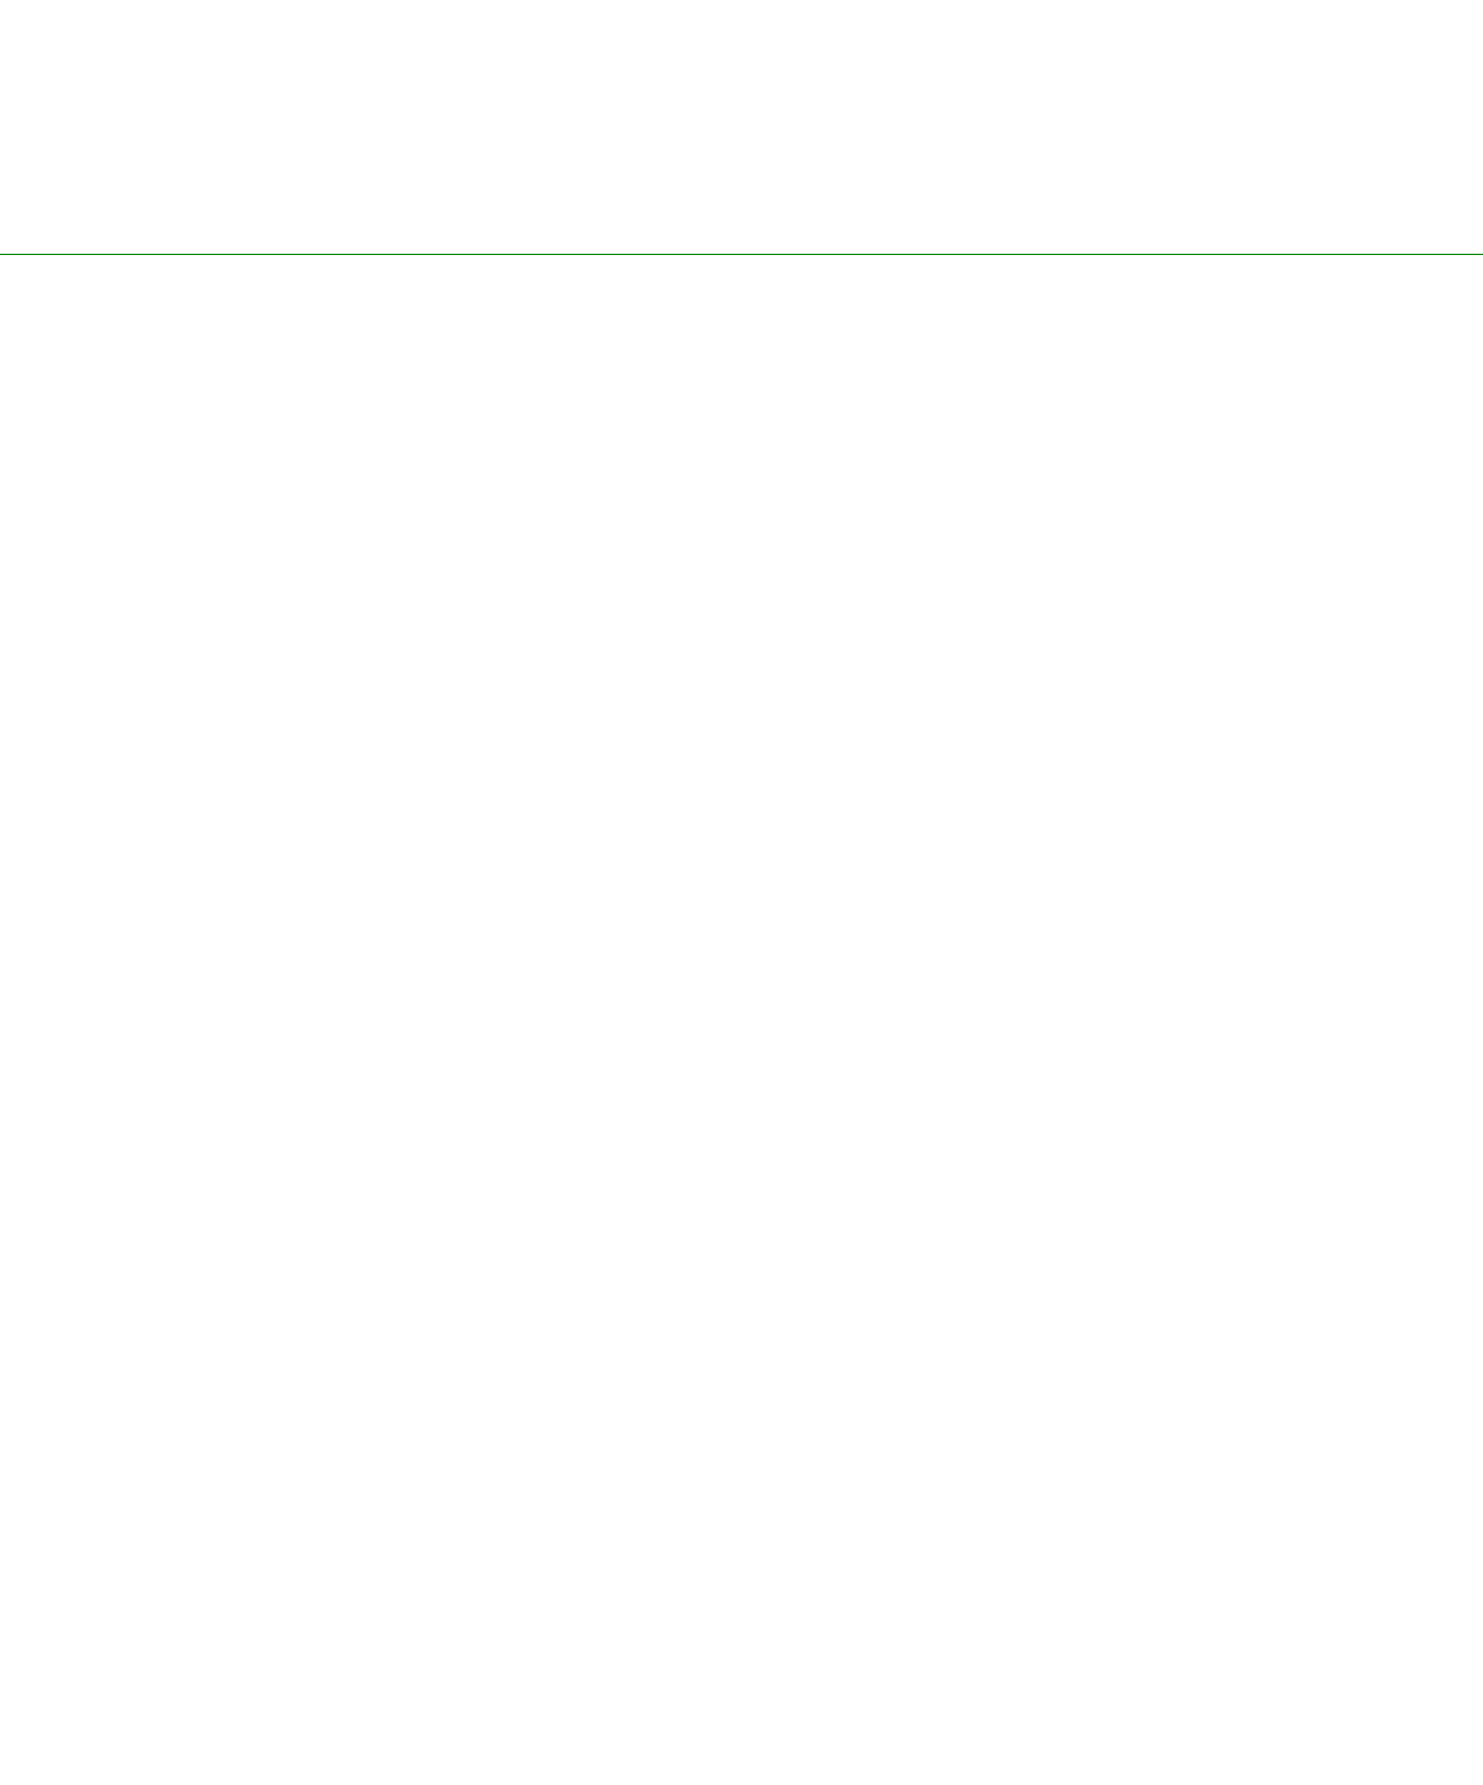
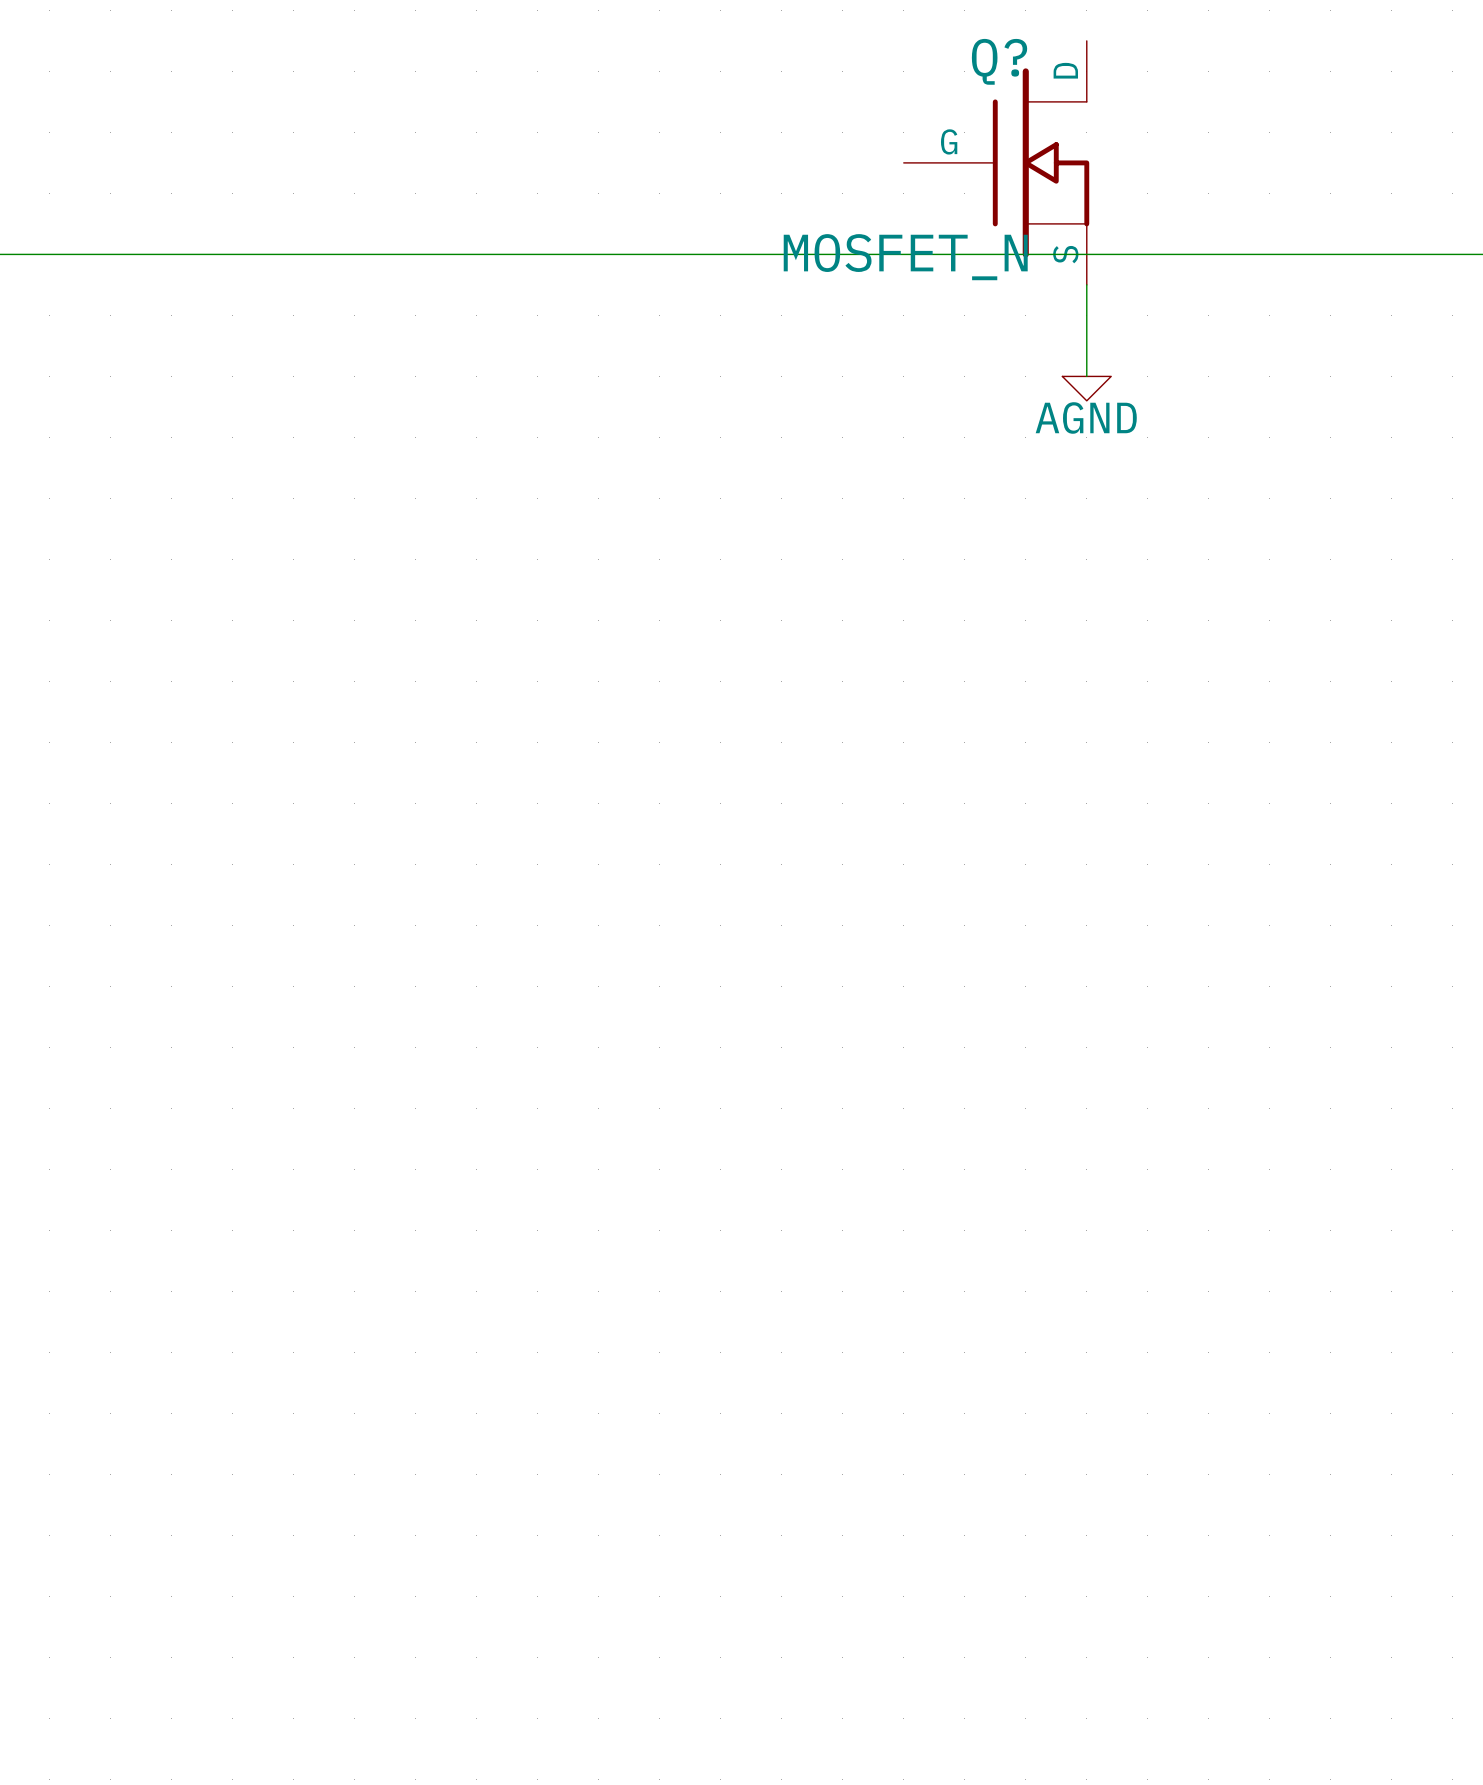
Q?: none -> MOSFET_N (996, 162)
wire: none -> (1086, 284) (1086, 376)
power symbol: none -> AGND (1086, 388)

